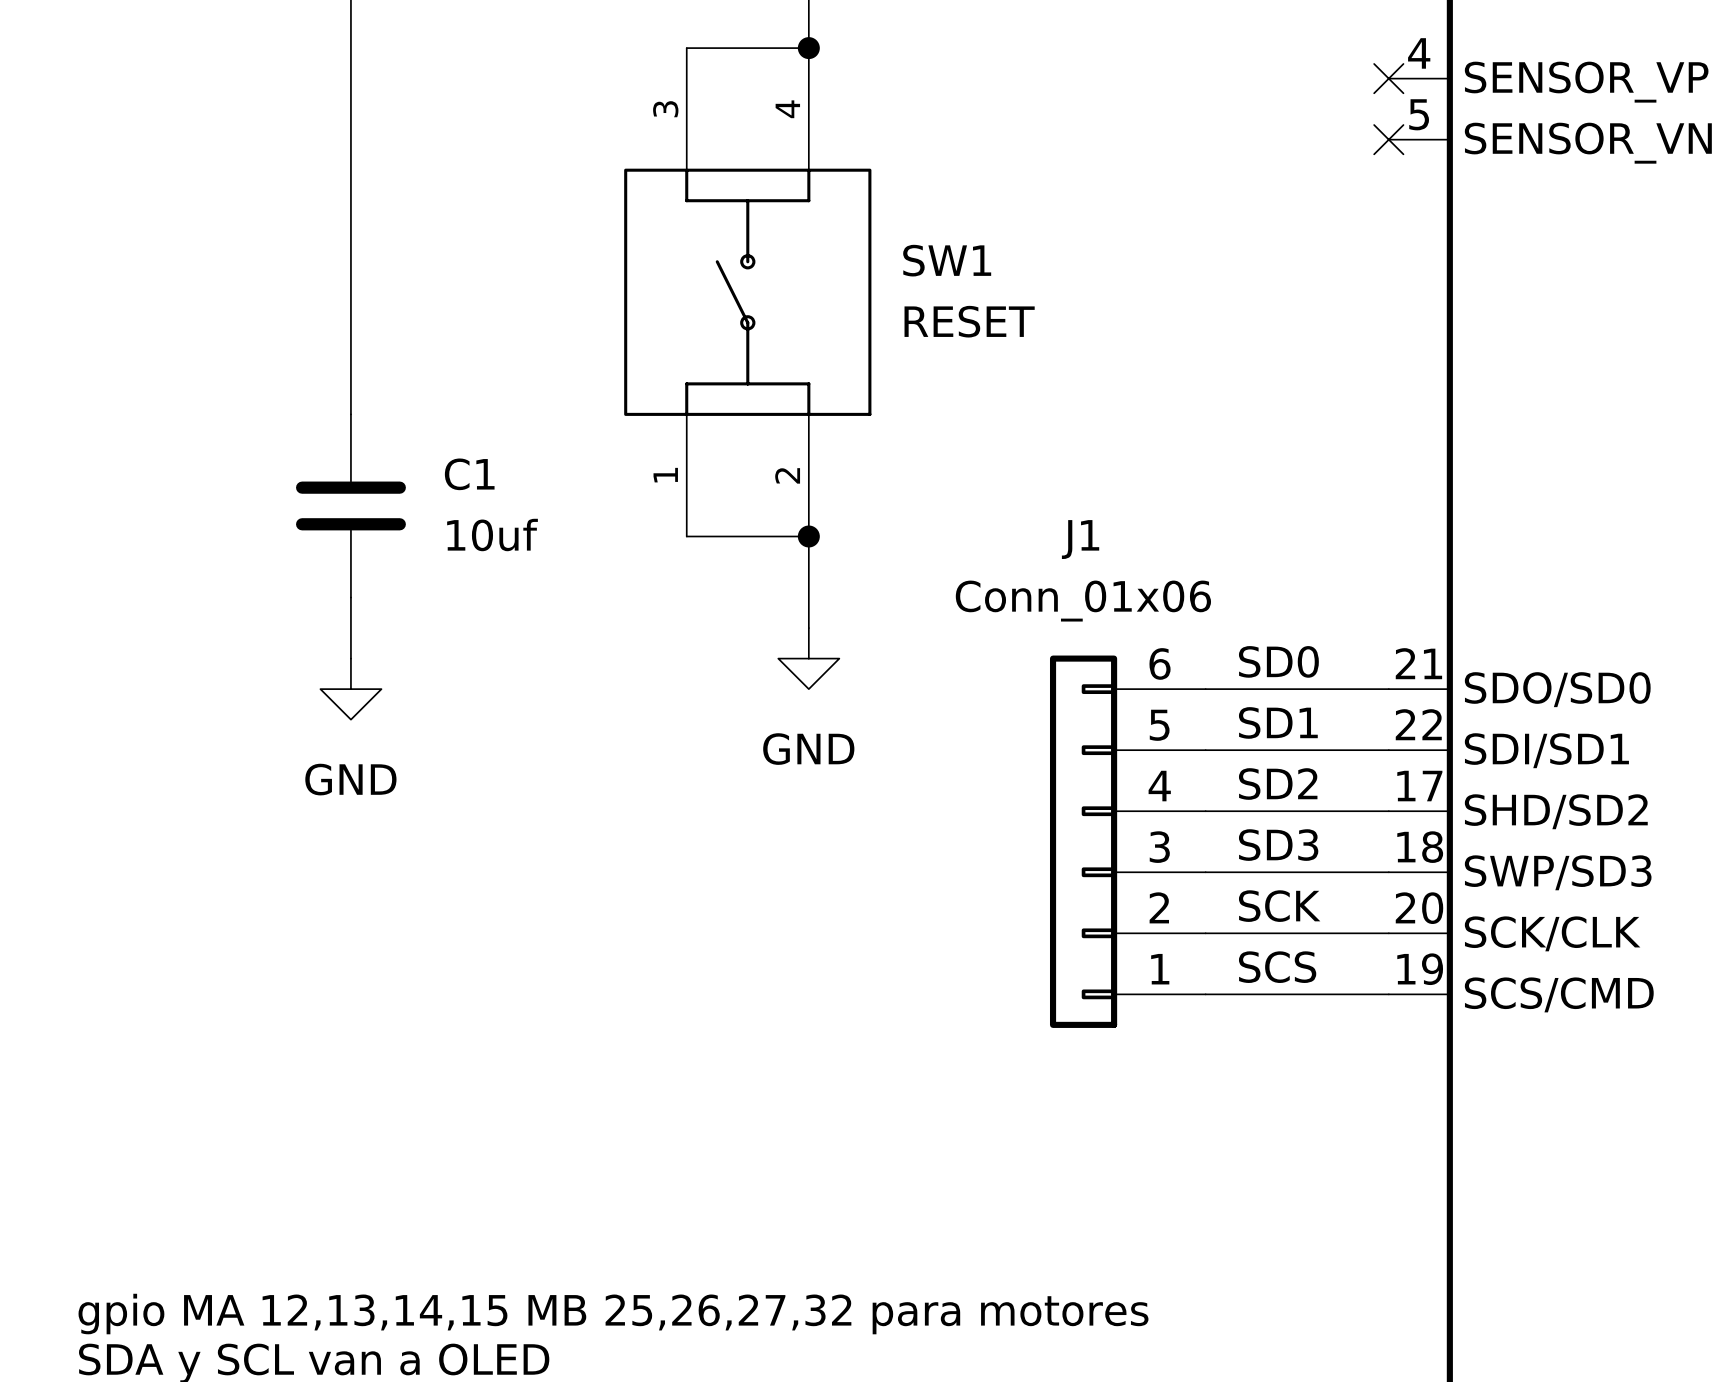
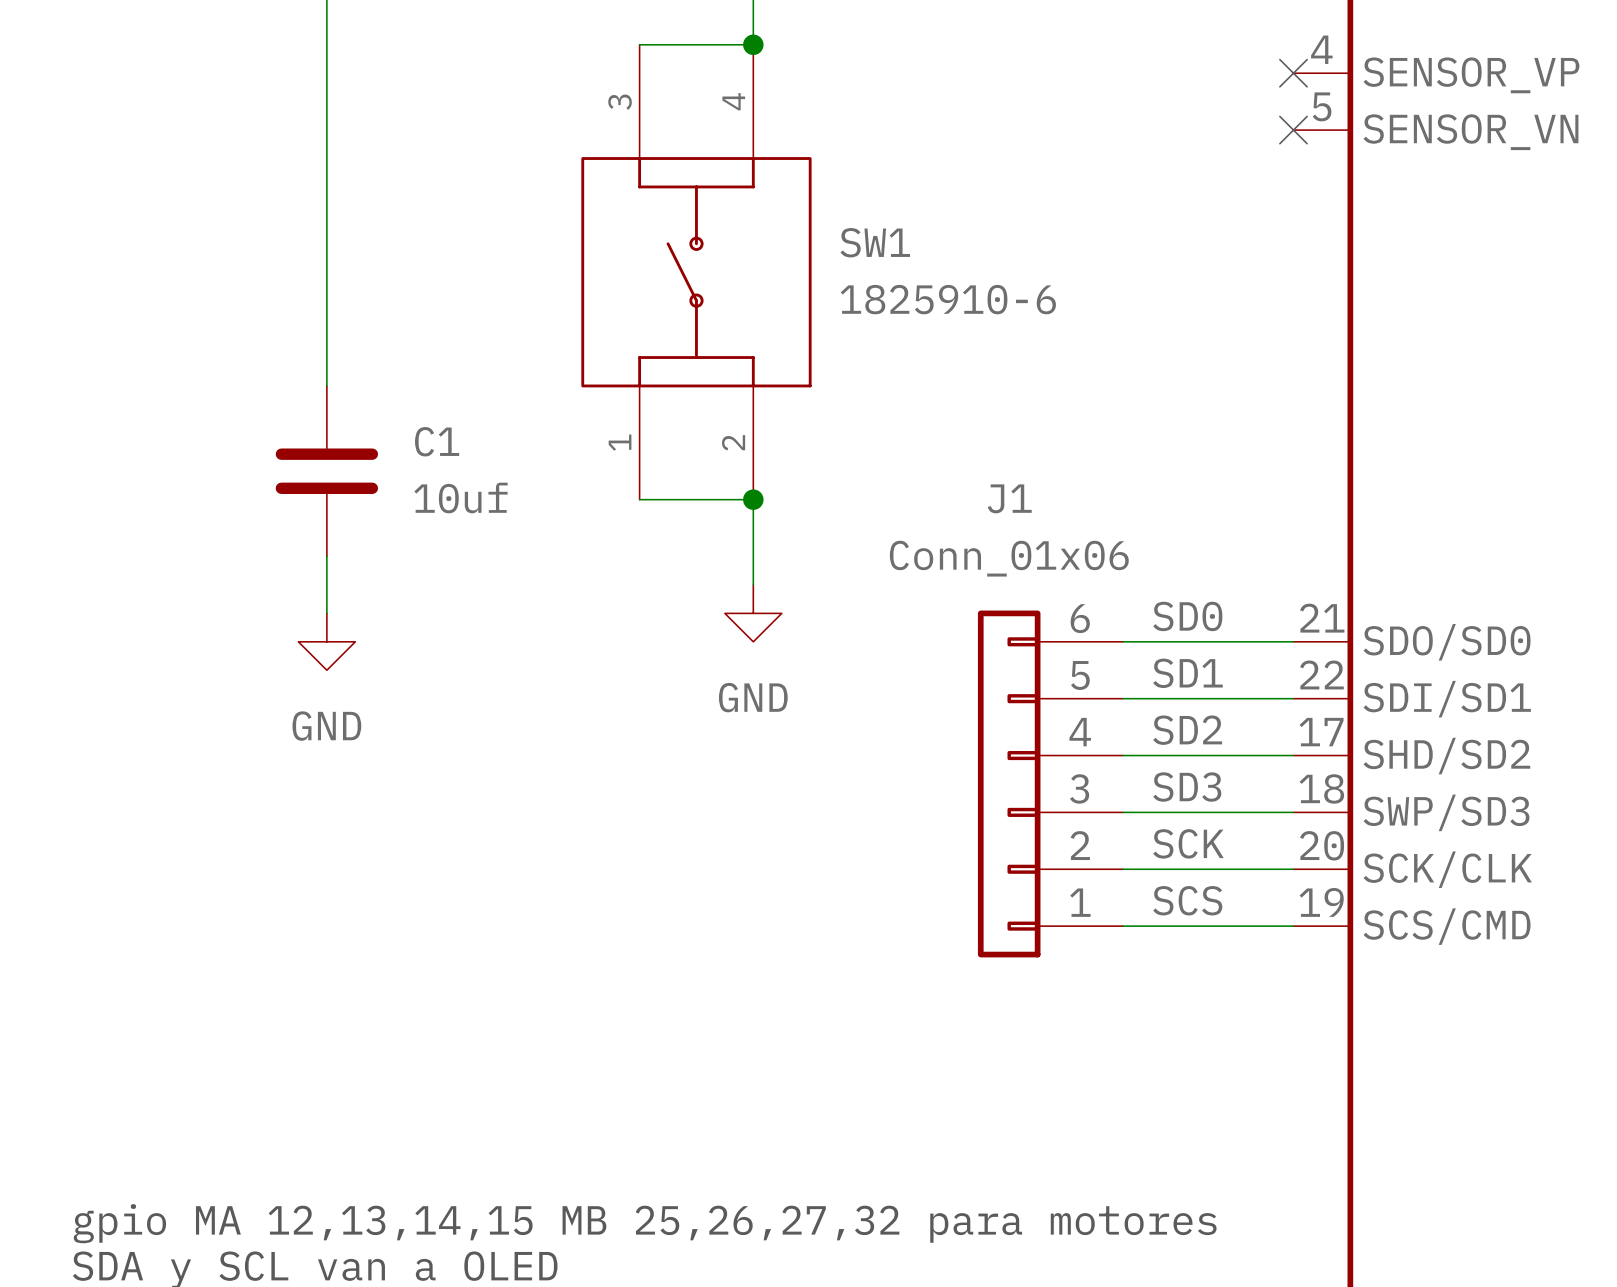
SW1 value: RESET (969, 321) -> 1825910-6 (948, 299)

